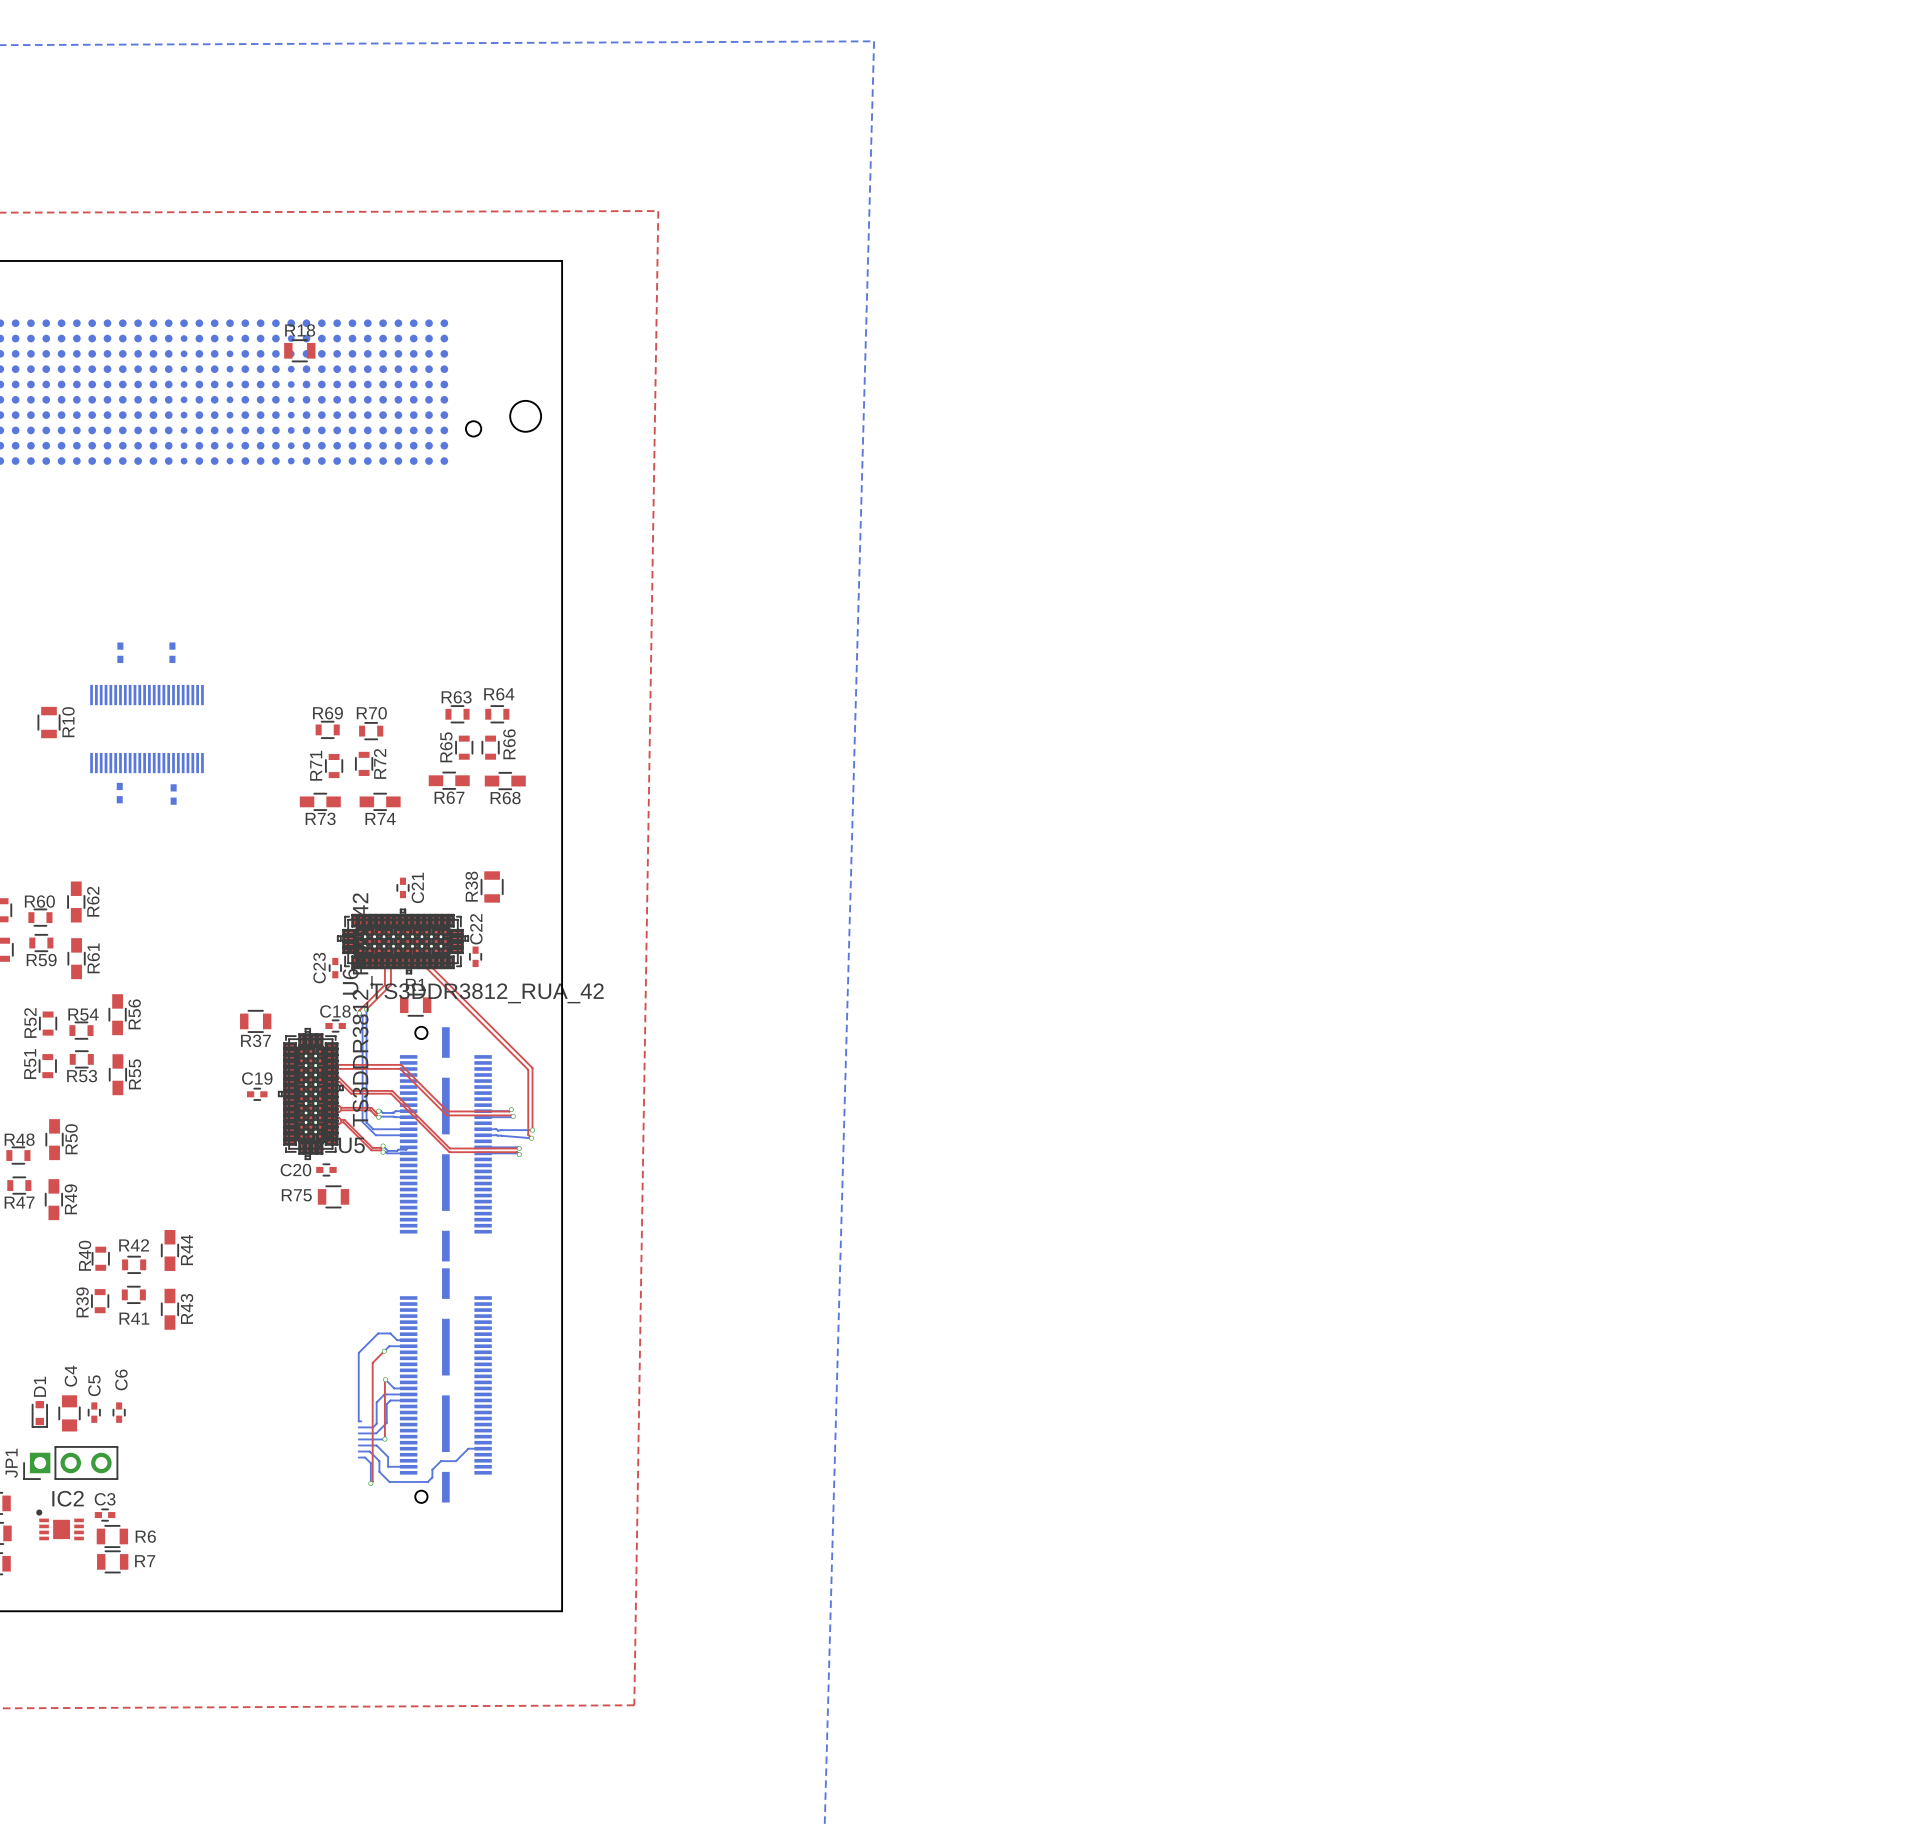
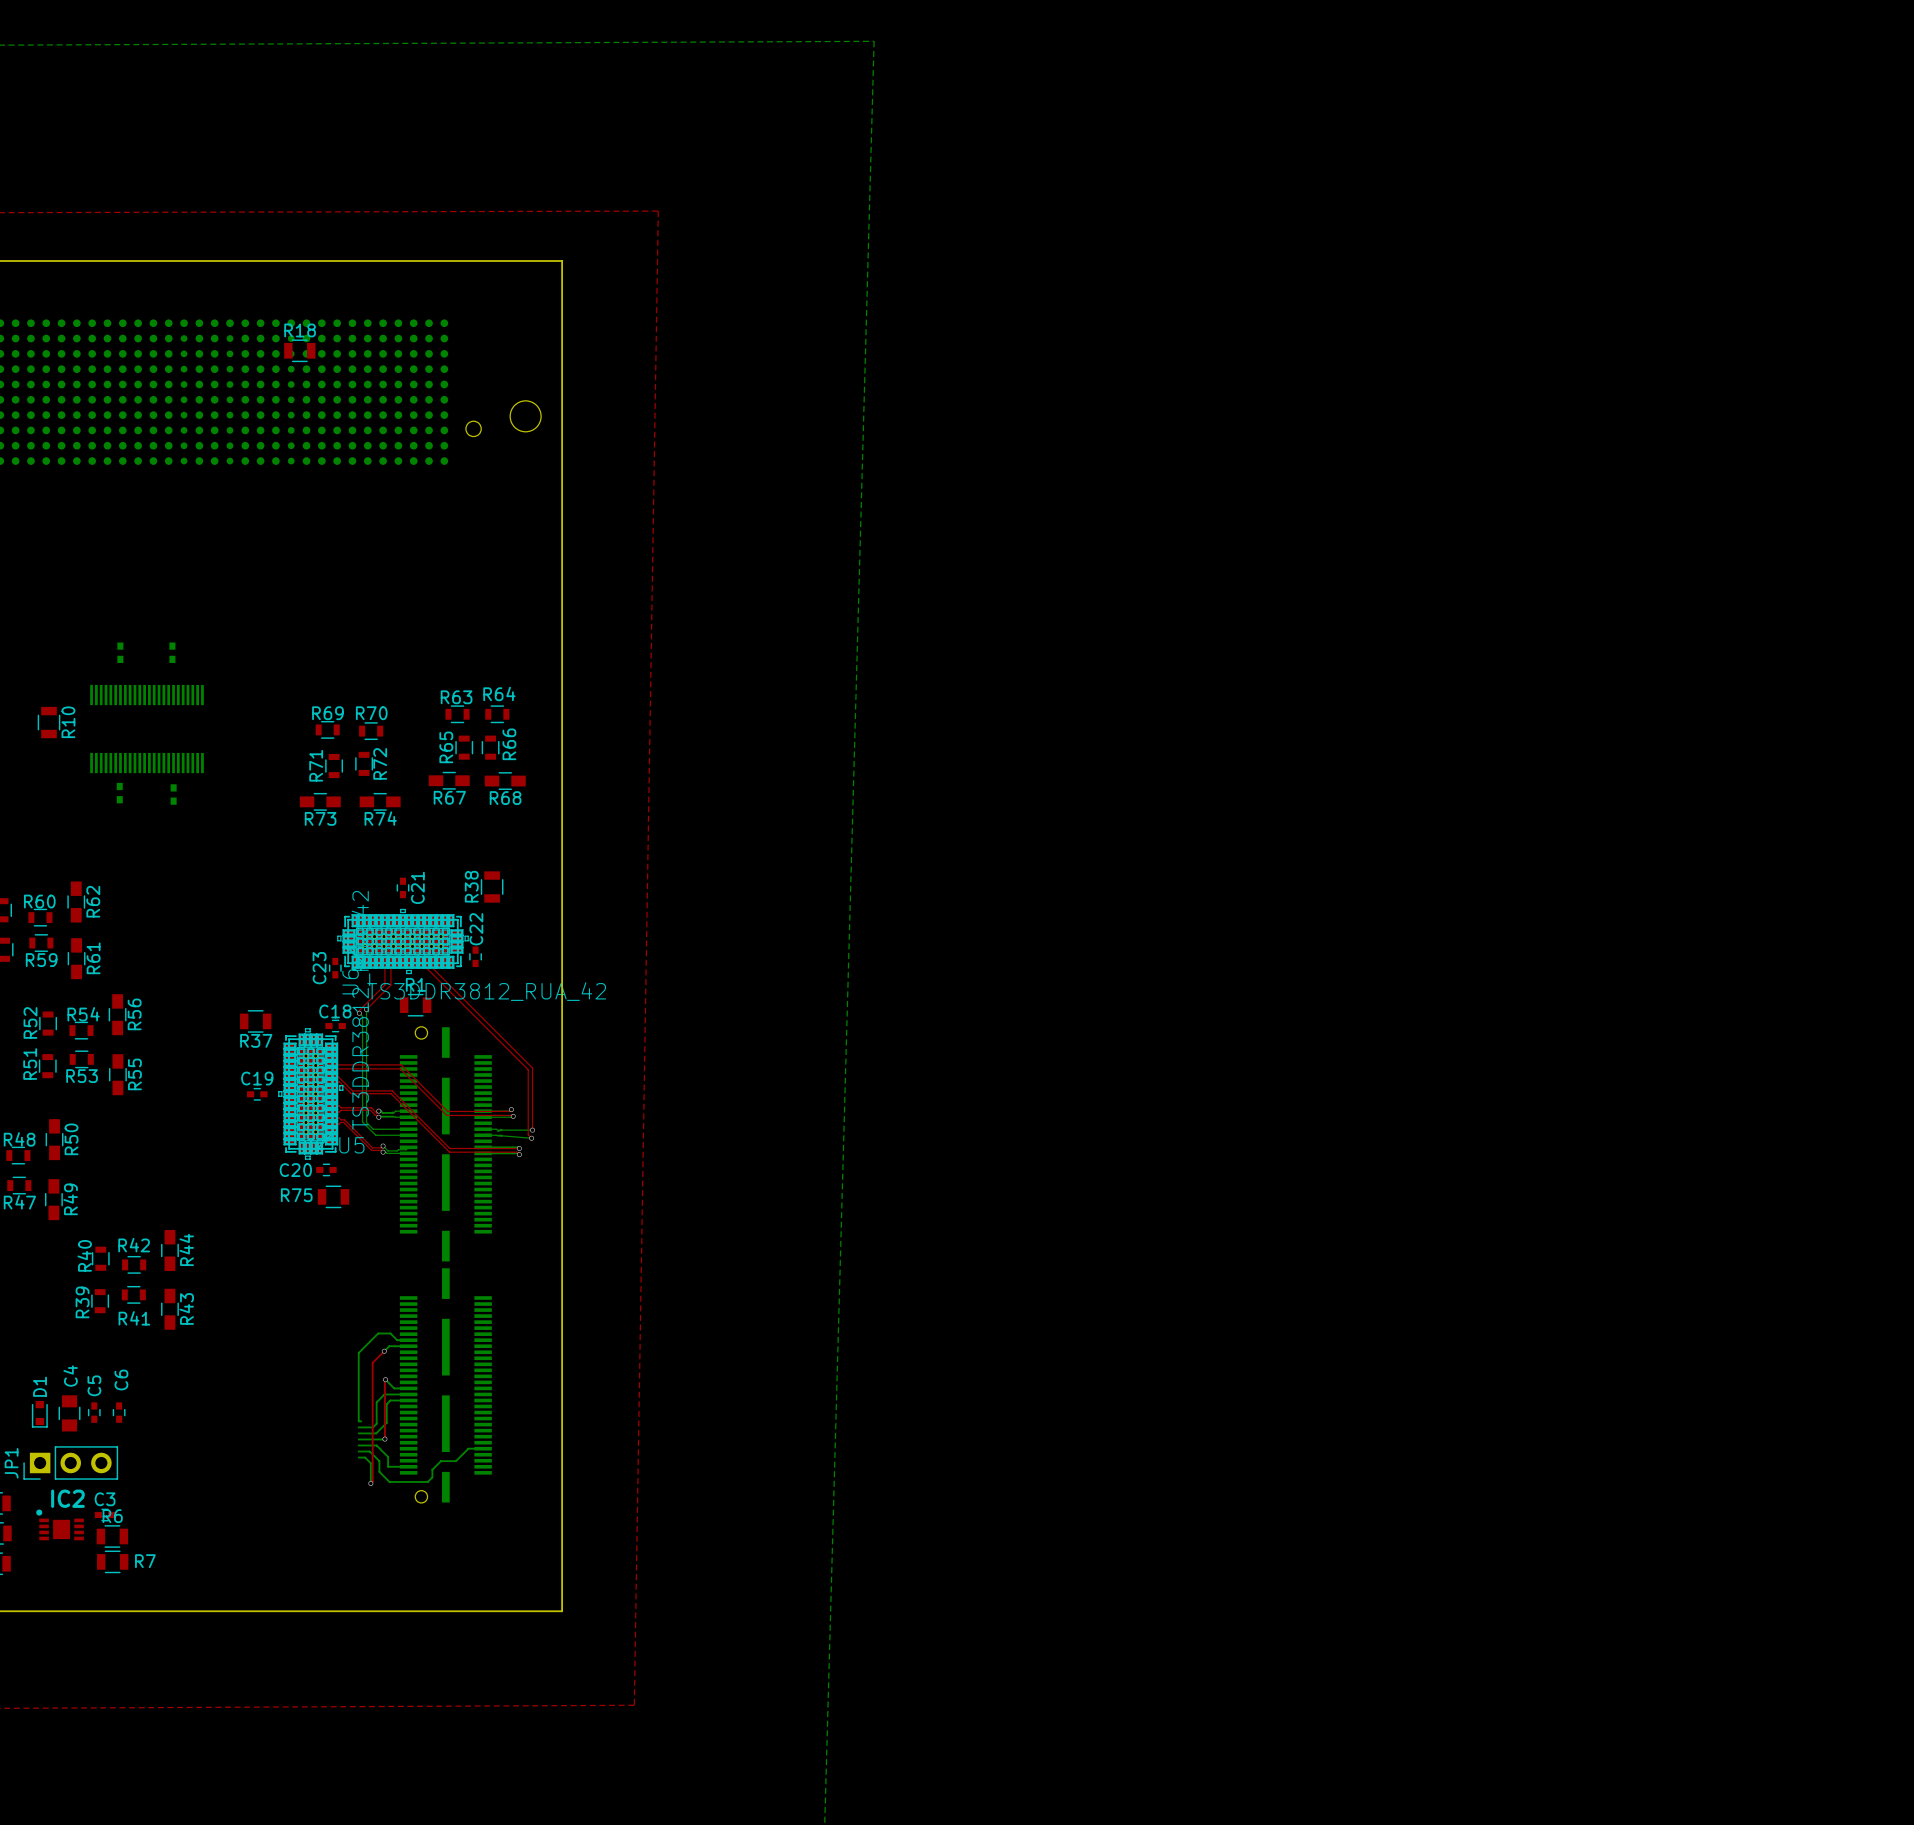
R6 name position: R6 (145, 1536) -> R6 (112, 1516)

